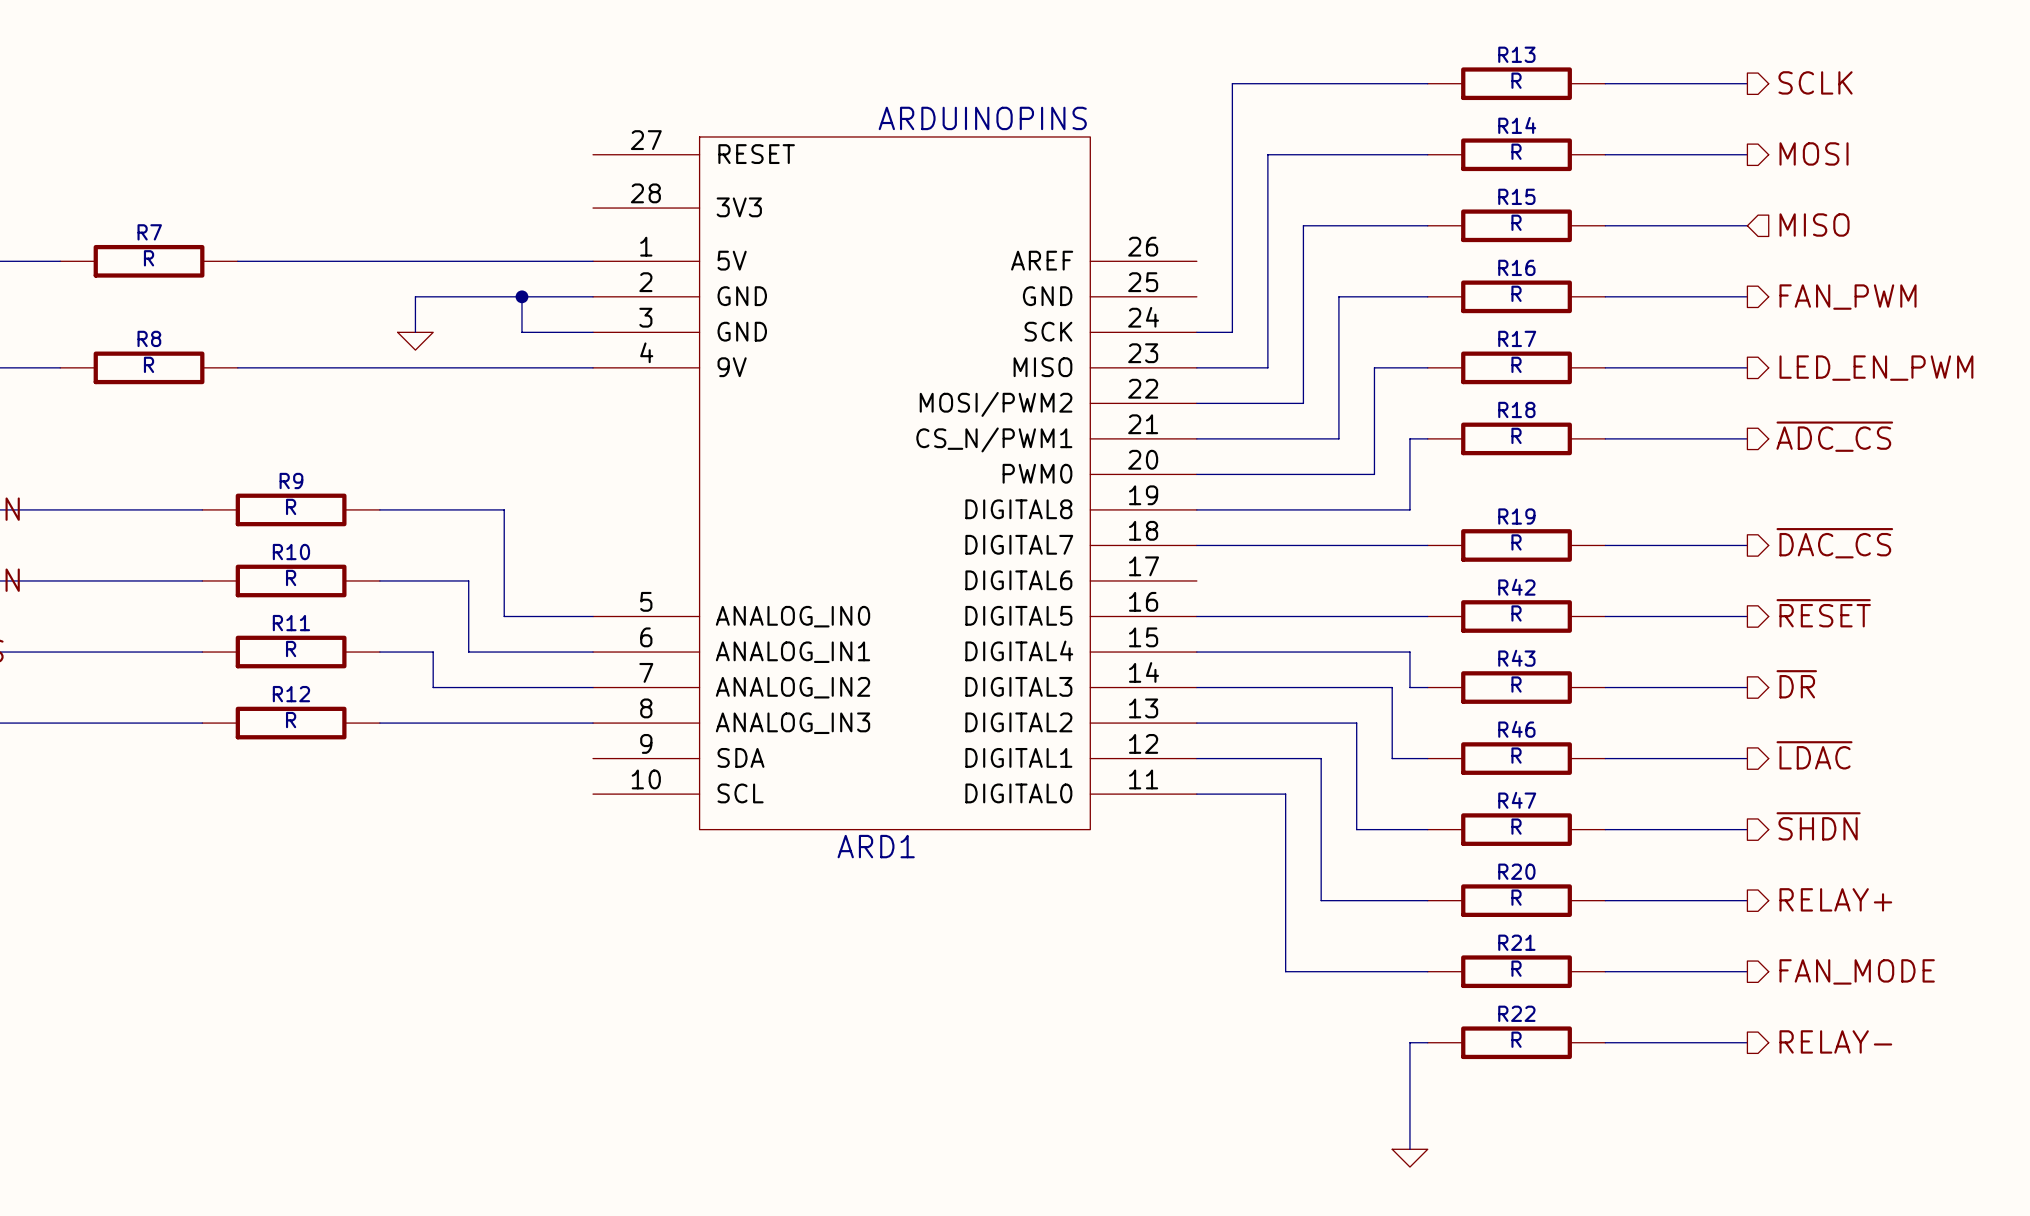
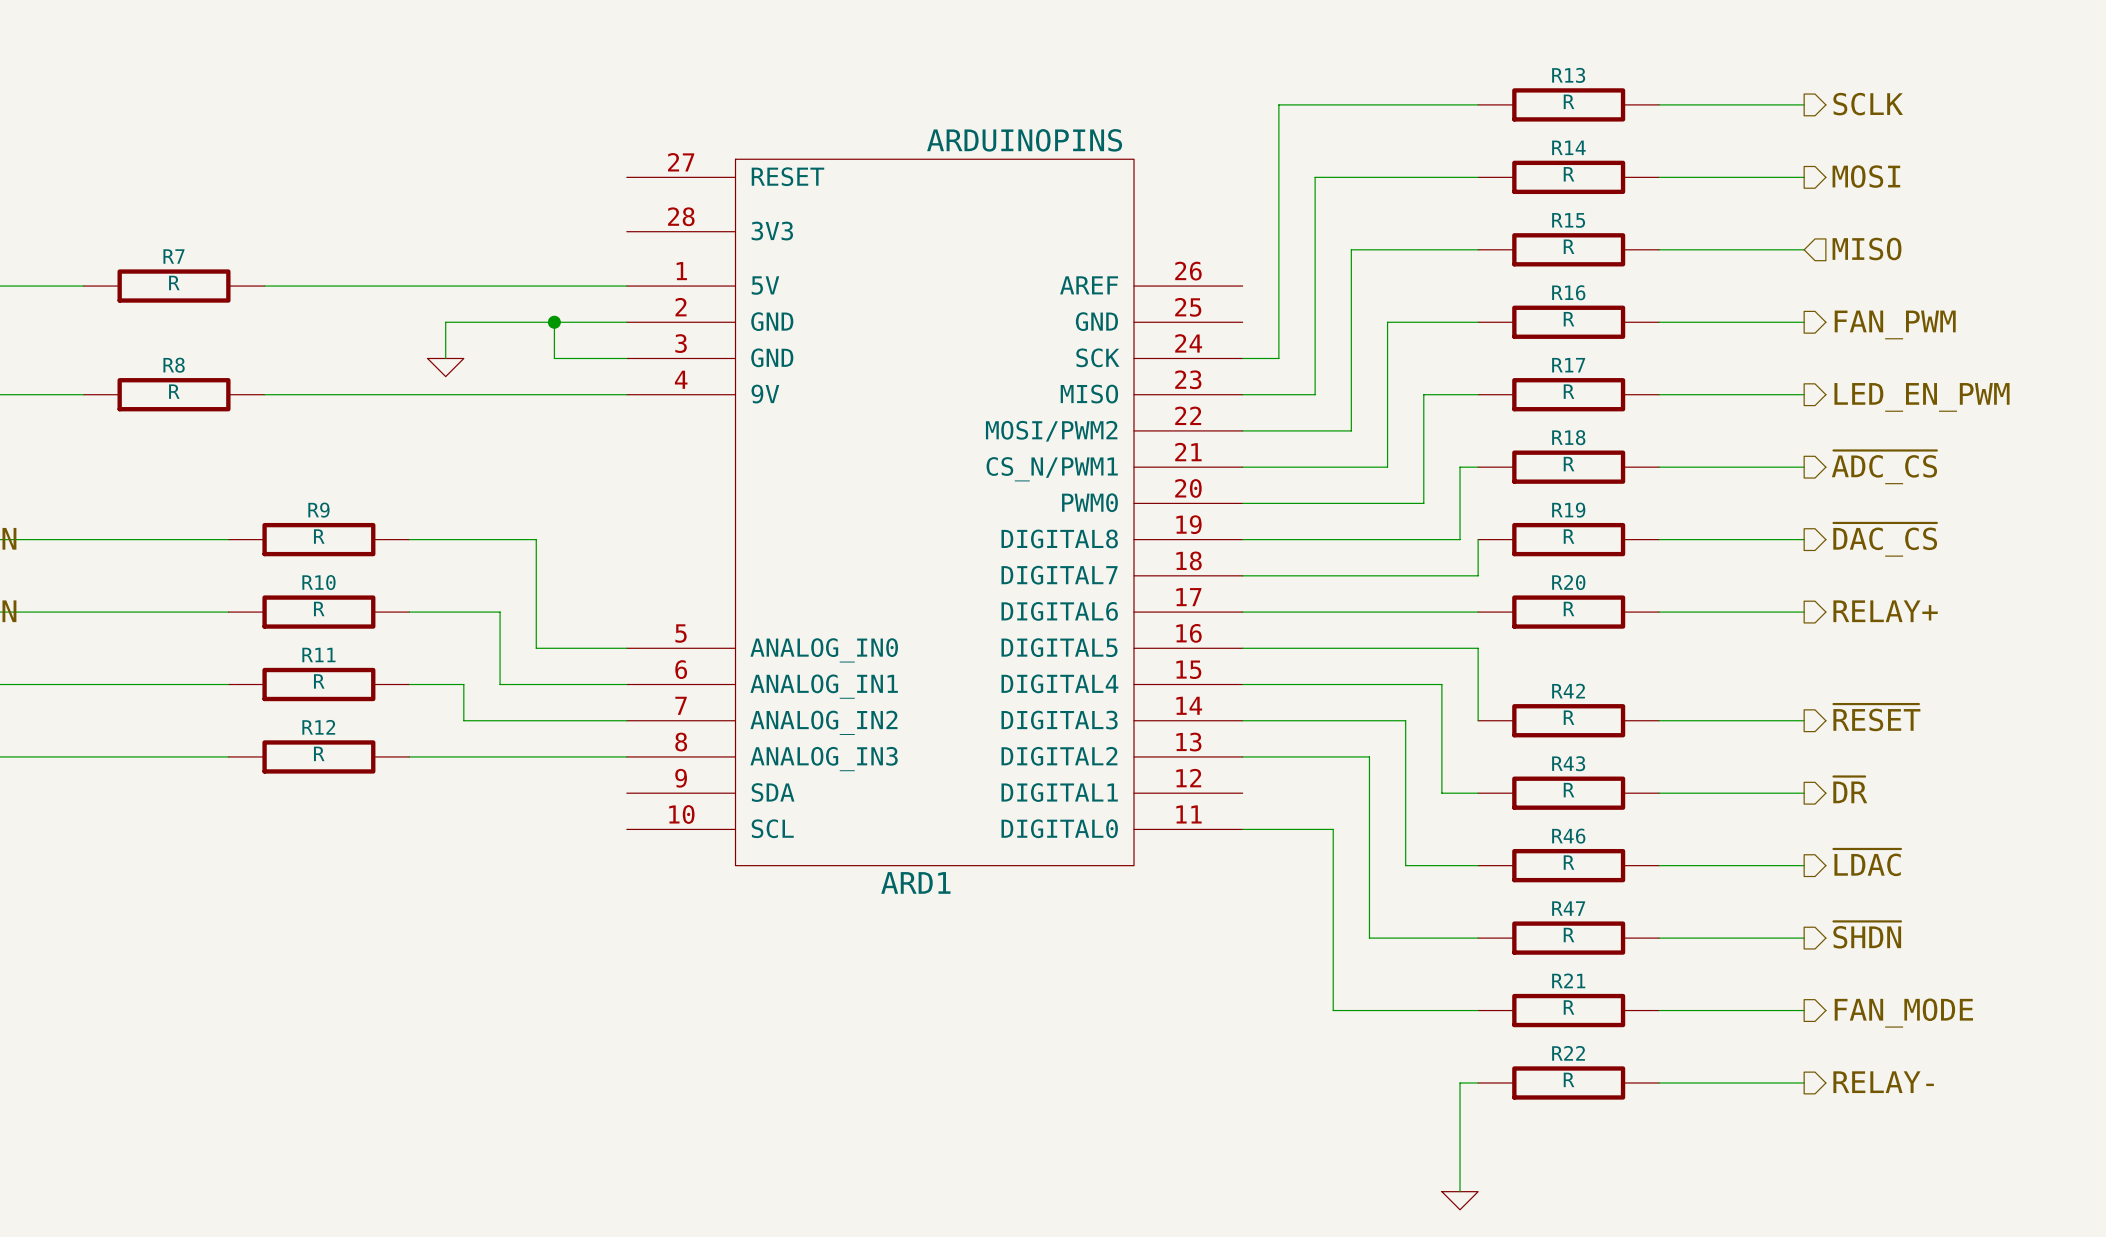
wire: none -> (1478, 539) (1478, 575)
hierarchical label position: ~{DAC_CS} (1834, 543) -> ~{DAC_CS} (1885, 539)
R19 position: (1516, 545) -> (1568, 539)
wire: (1605, 545) (1747, 545) -> (1659, 539) (1804, 539)
wire: none -> (1242, 612) (1478, 612)
R20: none -> R (1568, 612)
hierarchical label: none -> RELAY+ (1885, 611)
hierarchical label: ~{RESET} (1823, 613) -> none
wire: none -> (1478, 648) (1478, 720)
R42: R (1516, 616) -> none
wire: (1605, 616) (1747, 616) -> (1659, 612) (1804, 612)
wire: (1392, 652) (1409, 652) (1409, 687) (1427, 687) -> (1441, 684) (1441, 720)
R43 name: R43 (1516, 658) -> R42 (1568, 691)
hierarchical label: ~{DR} (1796, 684) -> ~{RESET} (1876, 717)
wire: (1356, 687) (1392, 687) -> (1405, 720) (1405, 756)
wire: (1321, 723) (1356, 723) -> (1369, 756) (1369, 793)
R46 name: R46 (1516, 729) -> R43 (1568, 763)
hierarchical label: ~{LDAC} (1814, 755) -> ~{DR} (1850, 789)
wire: (1196, 758) (1321, 758) -> none
R47 name: R47 (1517, 800) -> R46 (1568, 836)
hierarchical label: ~{SHDN} (1818, 826) -> ~{LDAC} (1867, 862)
R20 name: R20 (1516, 871) -> R47 (1568, 908)
hierarchical label: RELAY+ (1835, 899) -> ~{SHDN} (1867, 934)

